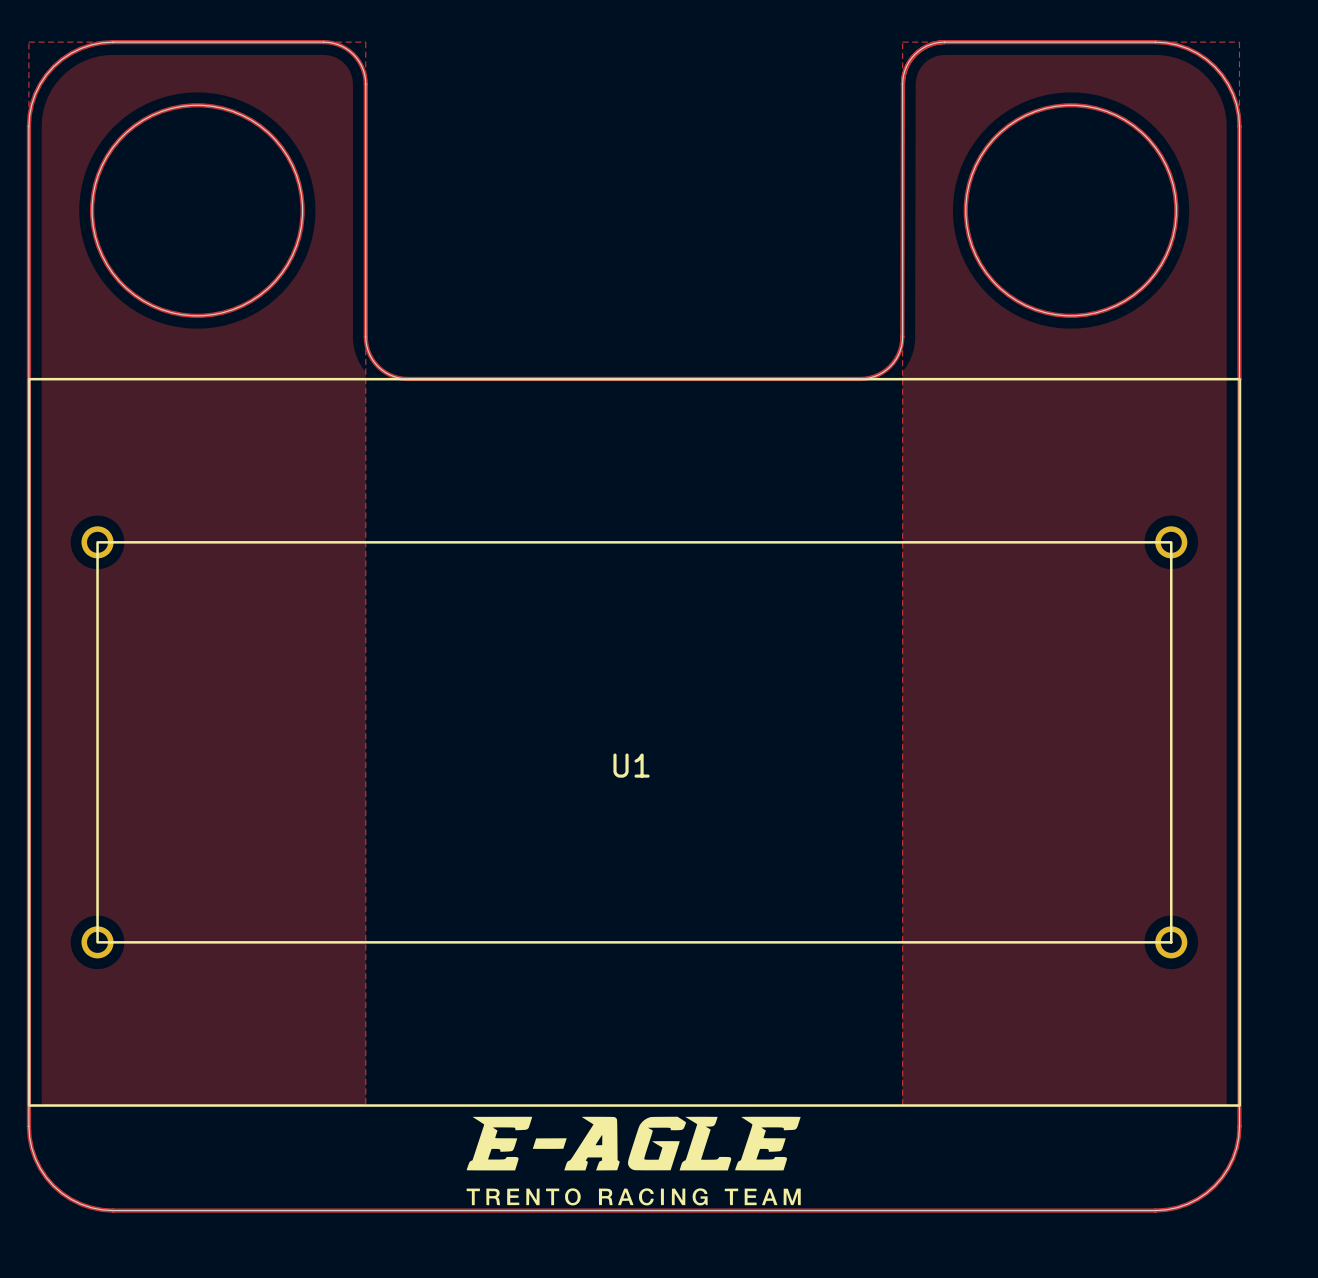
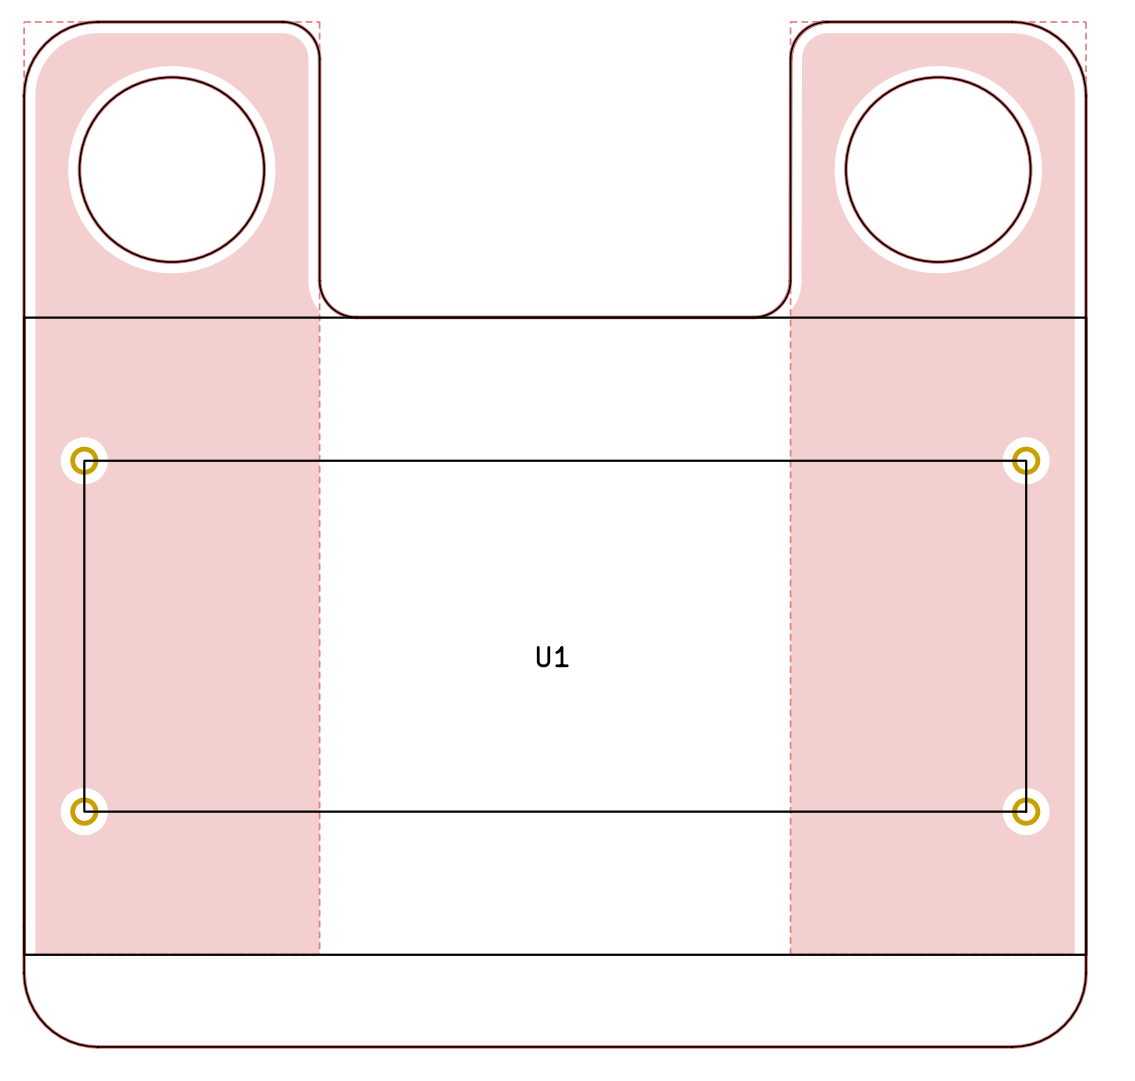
drawing: [466, 1116, 801, 1206] -> none

